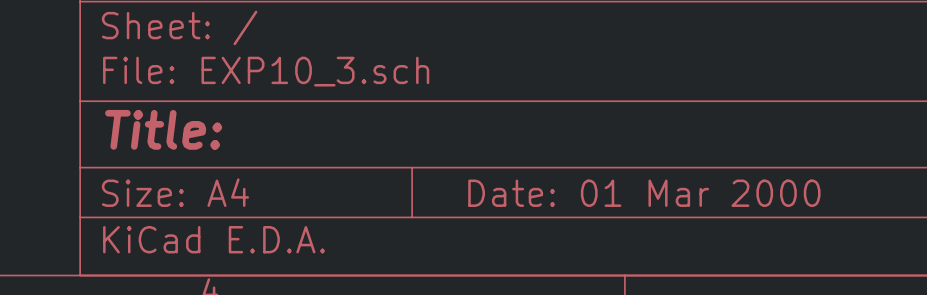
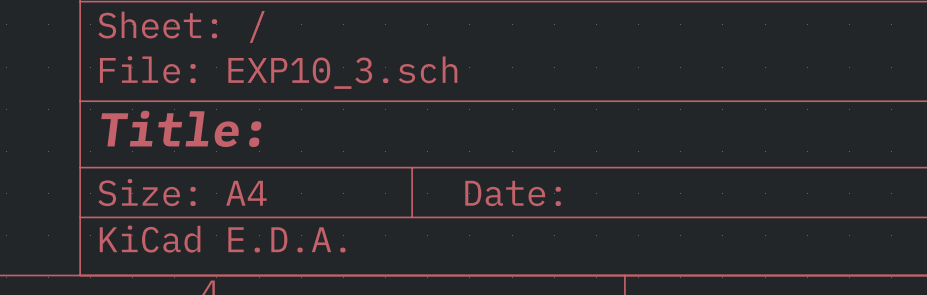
title block: Date: 01 Mar 2000 (644, 193) -> Date: (513, 193)

